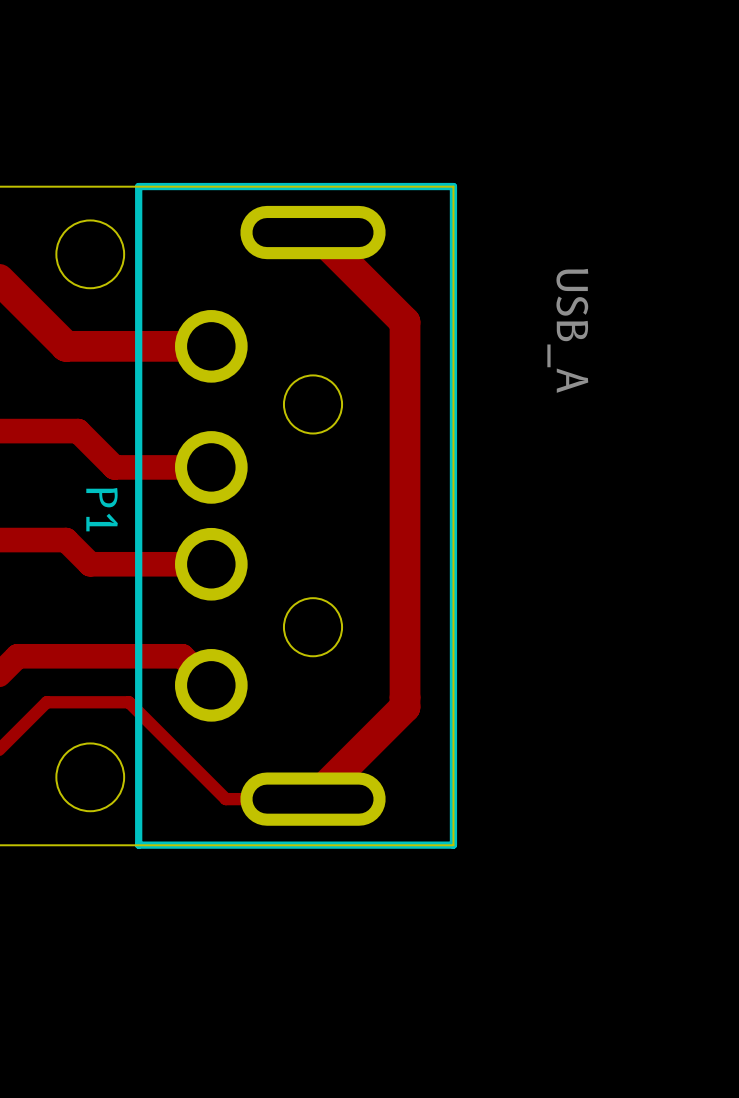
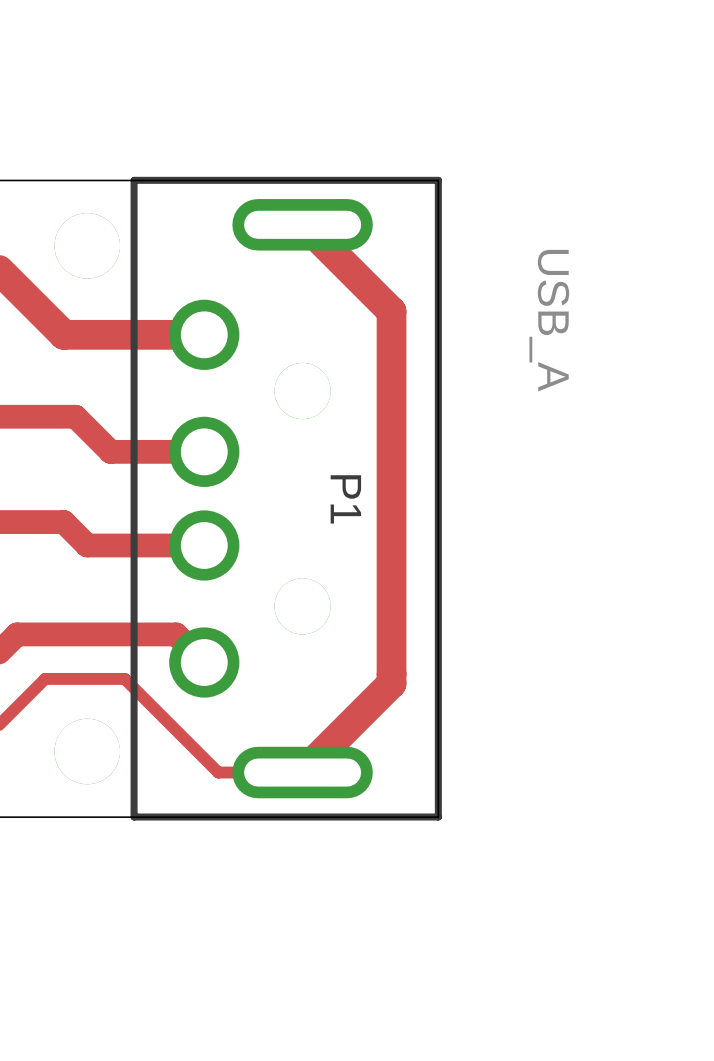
P1 footprint: [56, 182, 458, 849] -> [54, 176, 442, 821]
P1 name position: P1 (102, 509) -> P1 (345, 499)

